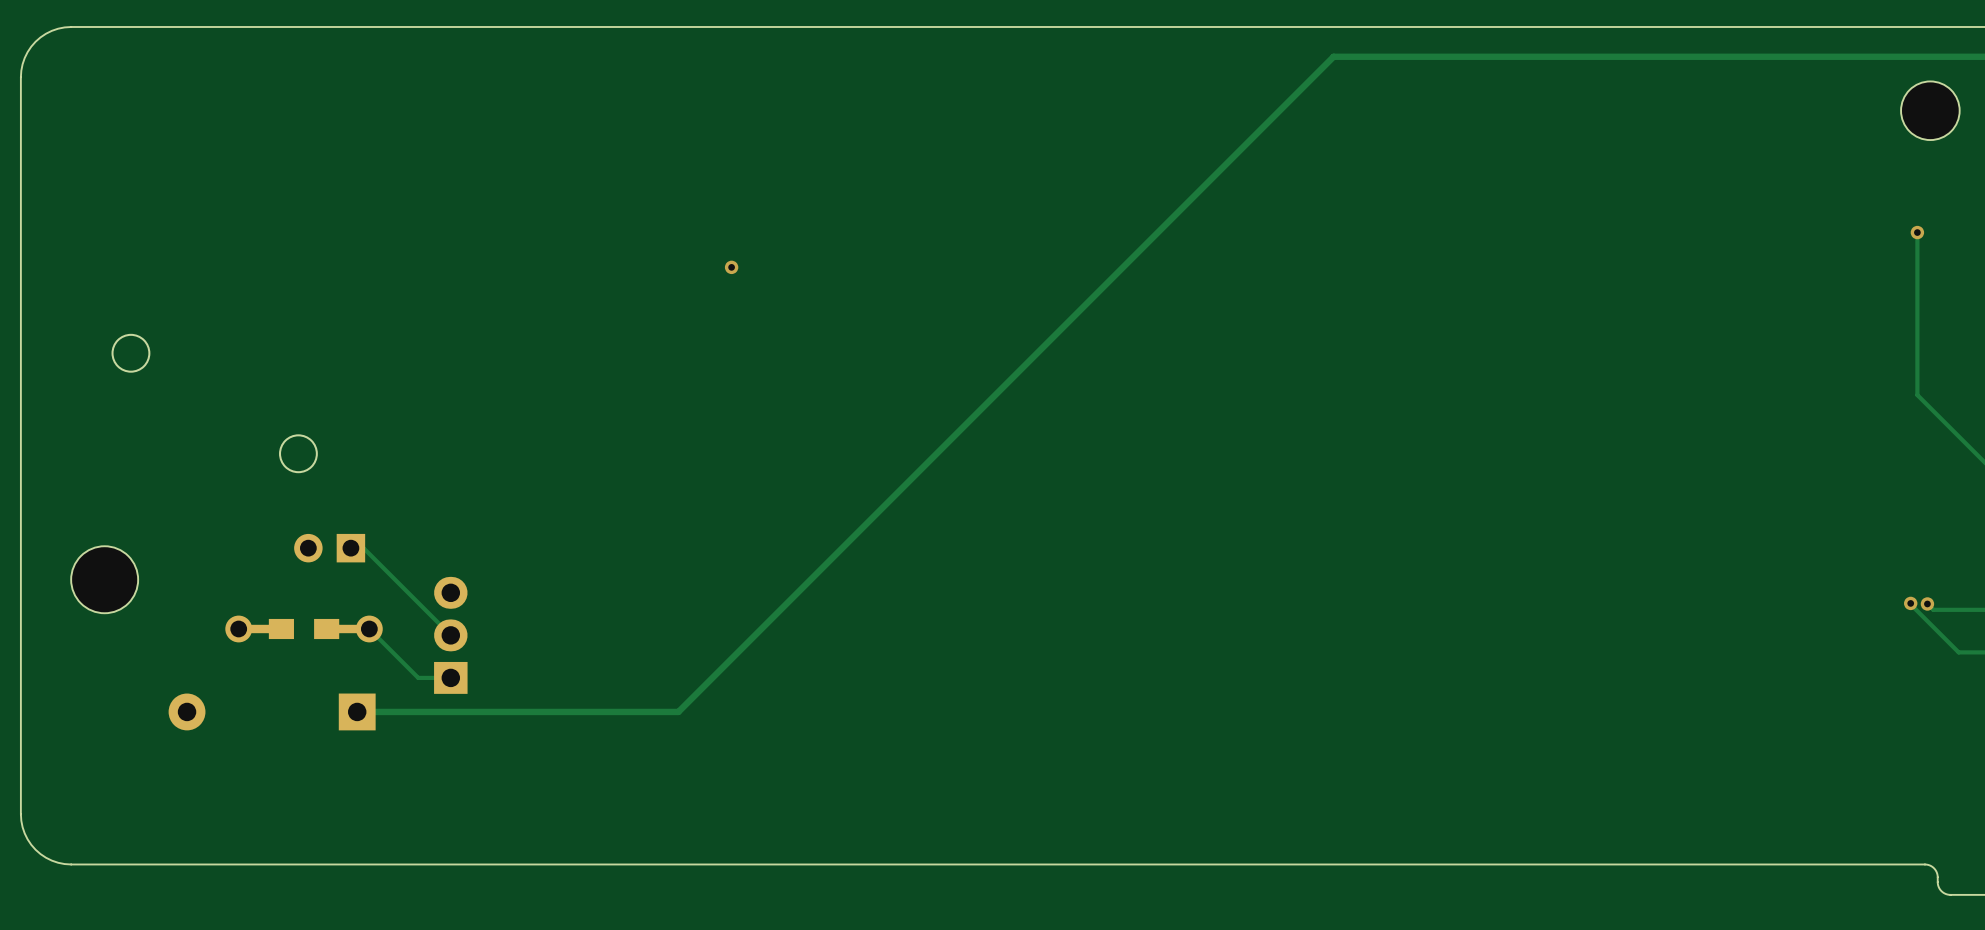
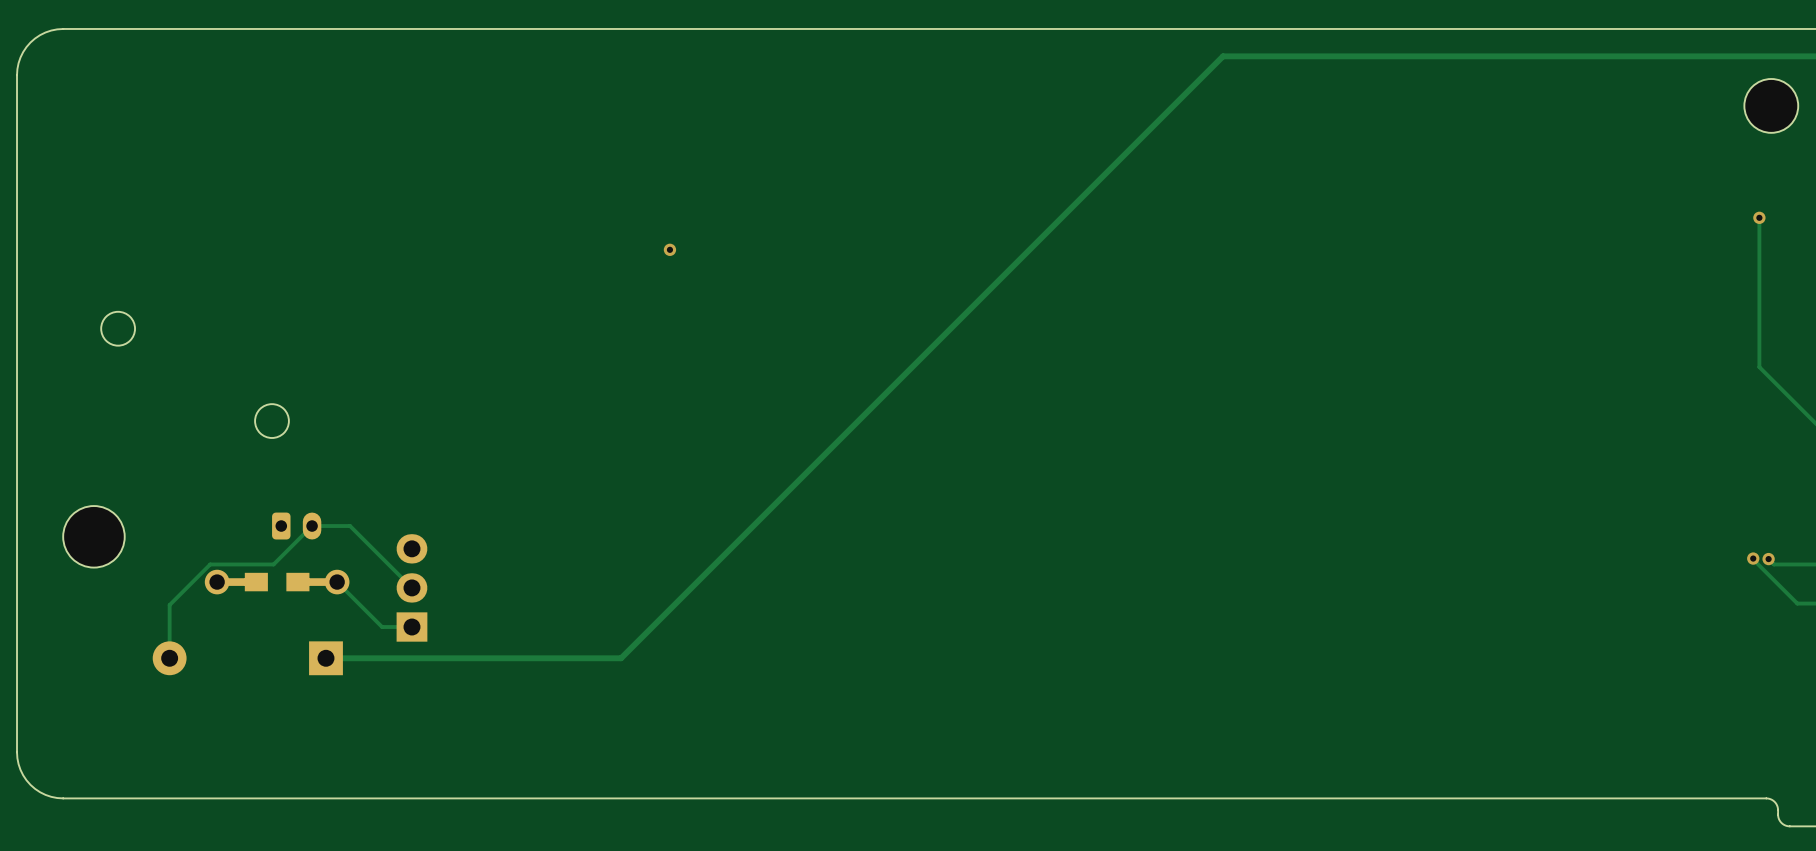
part: (329, 548) -> none
track: (350, 548) (363, 548) (383, 568) -> (169, 658) (169, 605) (210, 564) (273, 564) (312, 526) (350, 526)
part: none -> (296, 526)

